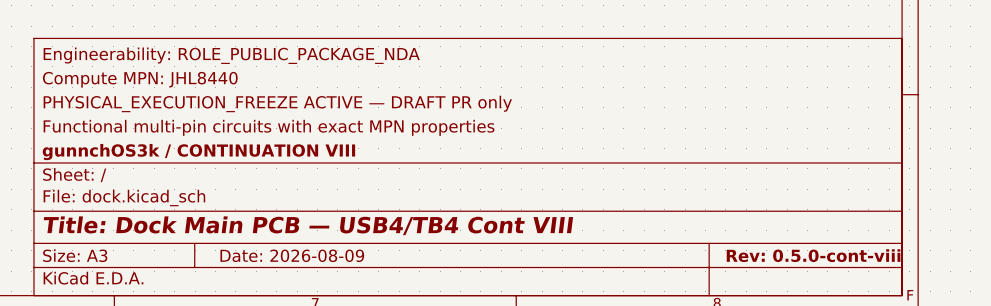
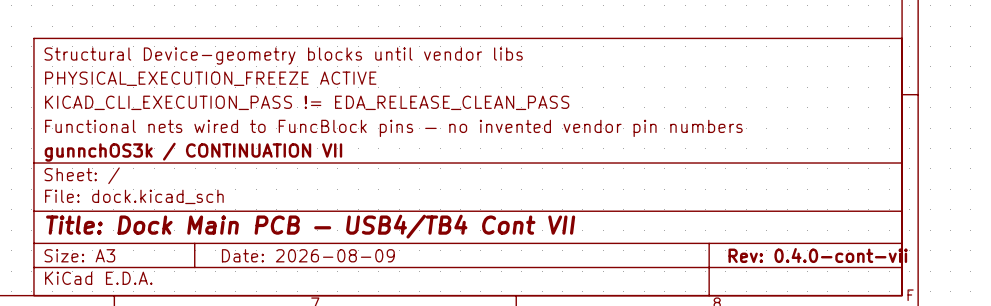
title block: Engineerability: ROLE_PUBLIC_PACKAGE_NDA (231, 55) -> Structural Device-geometry blocks until vendor libs (283, 56)
title block: Compute MPN: JHL8440 (140, 79) -> PHYSICAL_EXECUTION_FREEZE ACTIVE (210, 78)
title block: PHYSICAL_EXECUTION_FREEZE ACTIVE — DRAFT PR only (277, 103) -> KICAD_CLI_EXECUTION_PASS != EDA_RELEASE_CLEAN_PASS (307, 102)
title block: Functional multi-pin circuits with exact MPN properties (269, 127) -> Functional nets wired to FuncBlock pins — no invented vendor pin numbers (393, 128)
title block: gunnchOS3k / CONTINUATION VIII (198, 152) -> gunnchOS3k / CONTINUATION VII (193, 152)
title block: Title: Dock Main PCB — USB4/TB4 Cont VIII (308, 225) -> Title: Dock Main PCB — USB4/TB4 Cont VII (310, 226)
title block: Rev: 0.5.0-cont-viii (813, 255) -> Rev: 0.4.0-cont-vii (818, 255)

